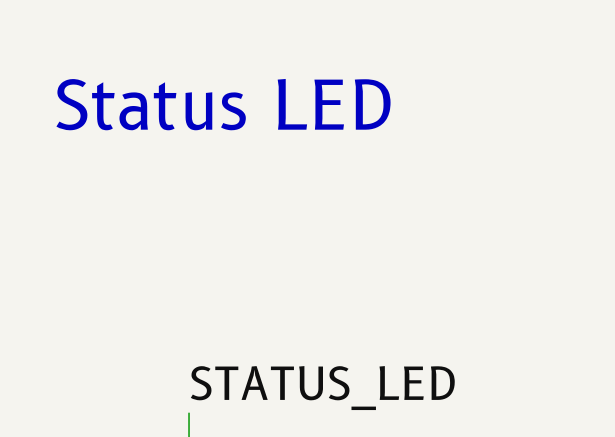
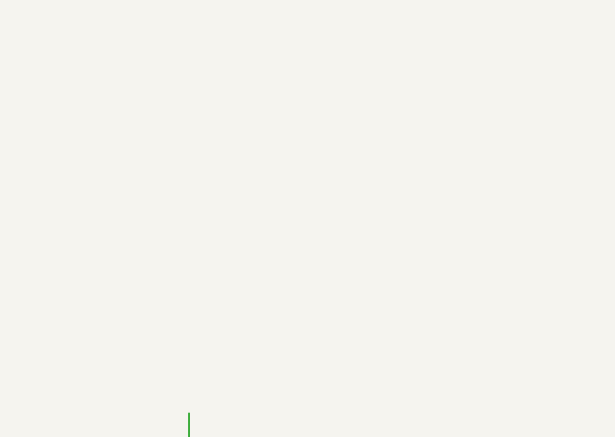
text: Status LED (223, 104) -> none
label: STATUS_LED (322, 388) -> none

